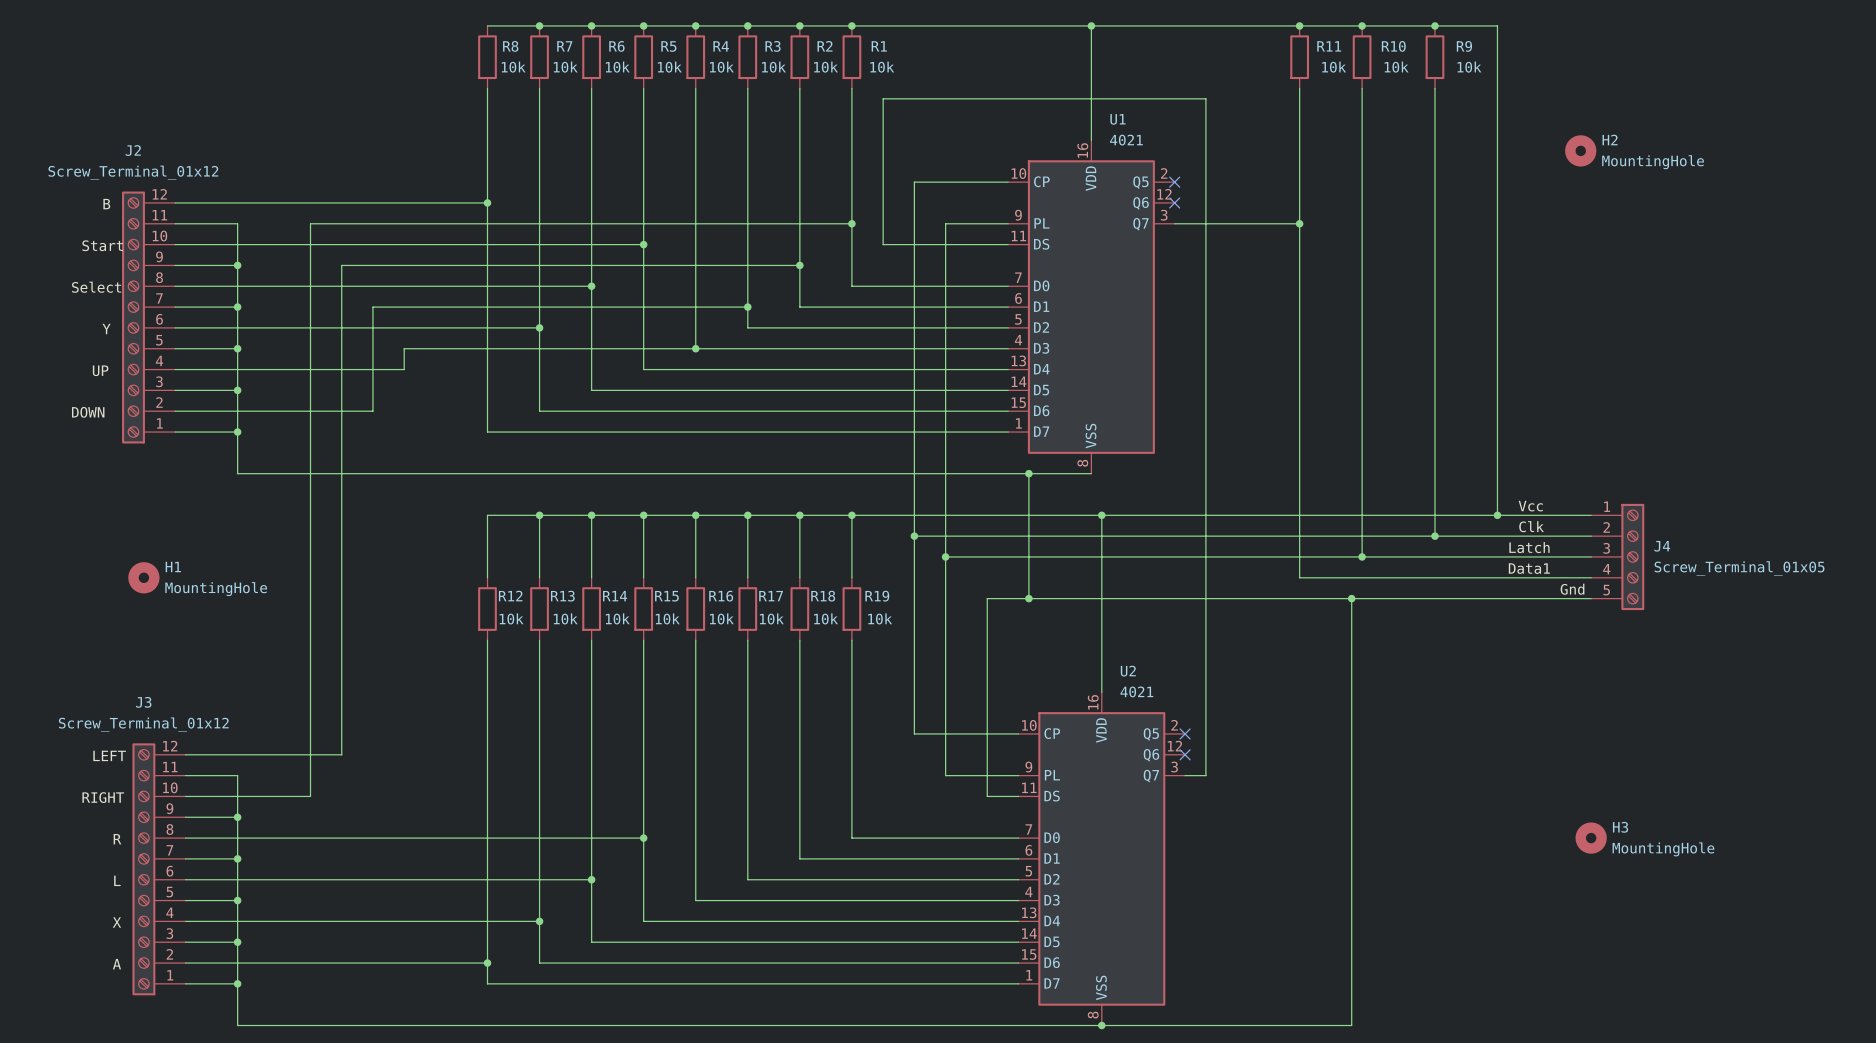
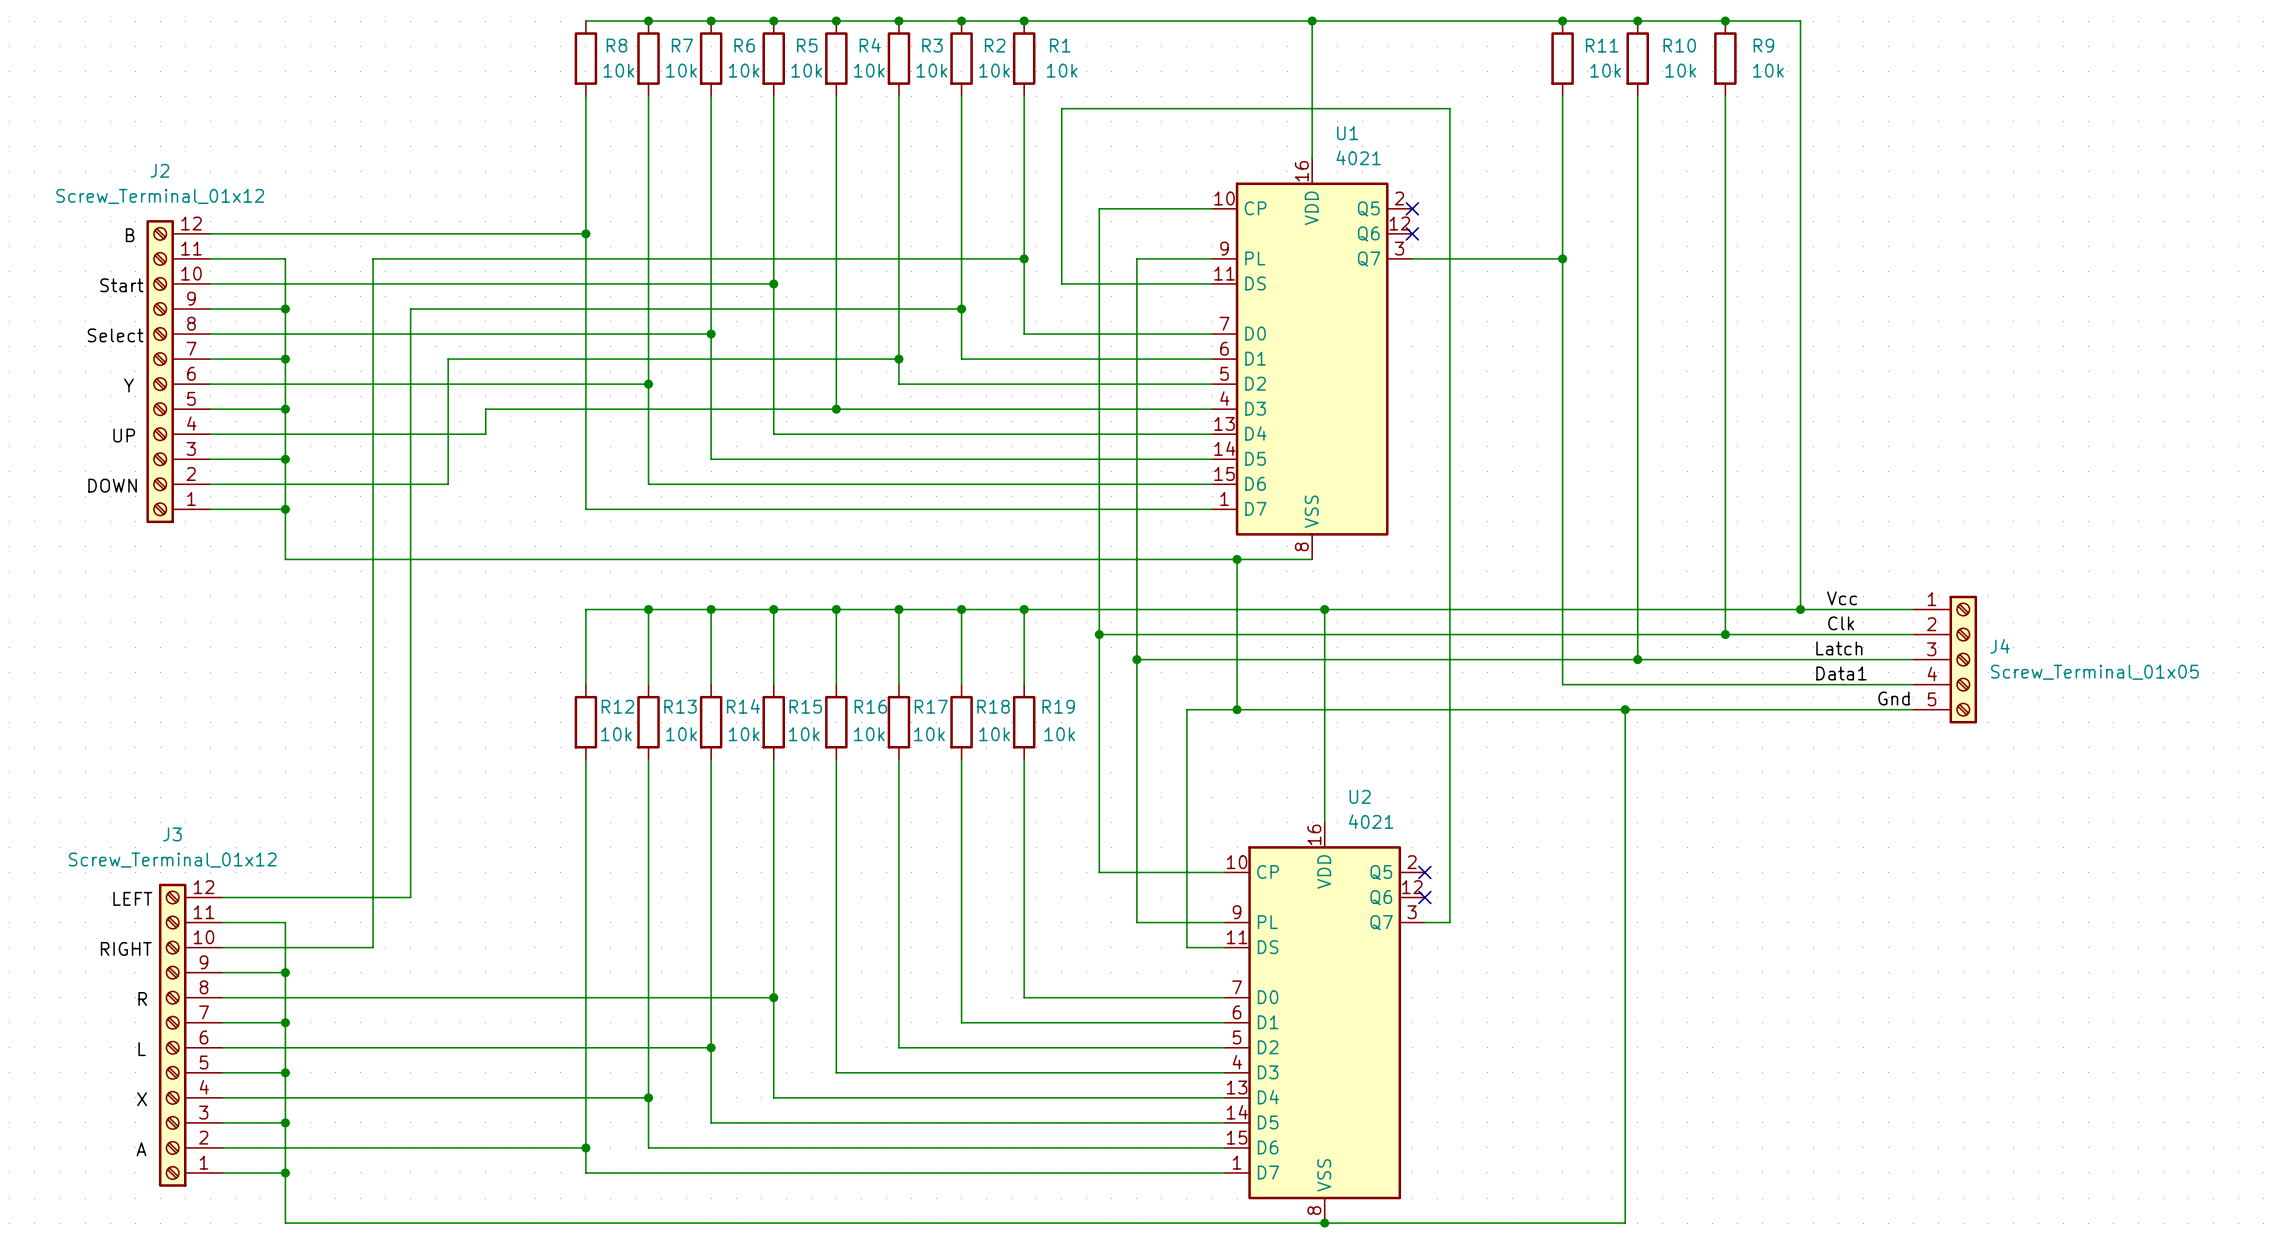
H2: MountingHole (1580, 150) -> none
H1: MountingHole (143, 577) -> none
H3: MountingHole (1591, 838) -> none

